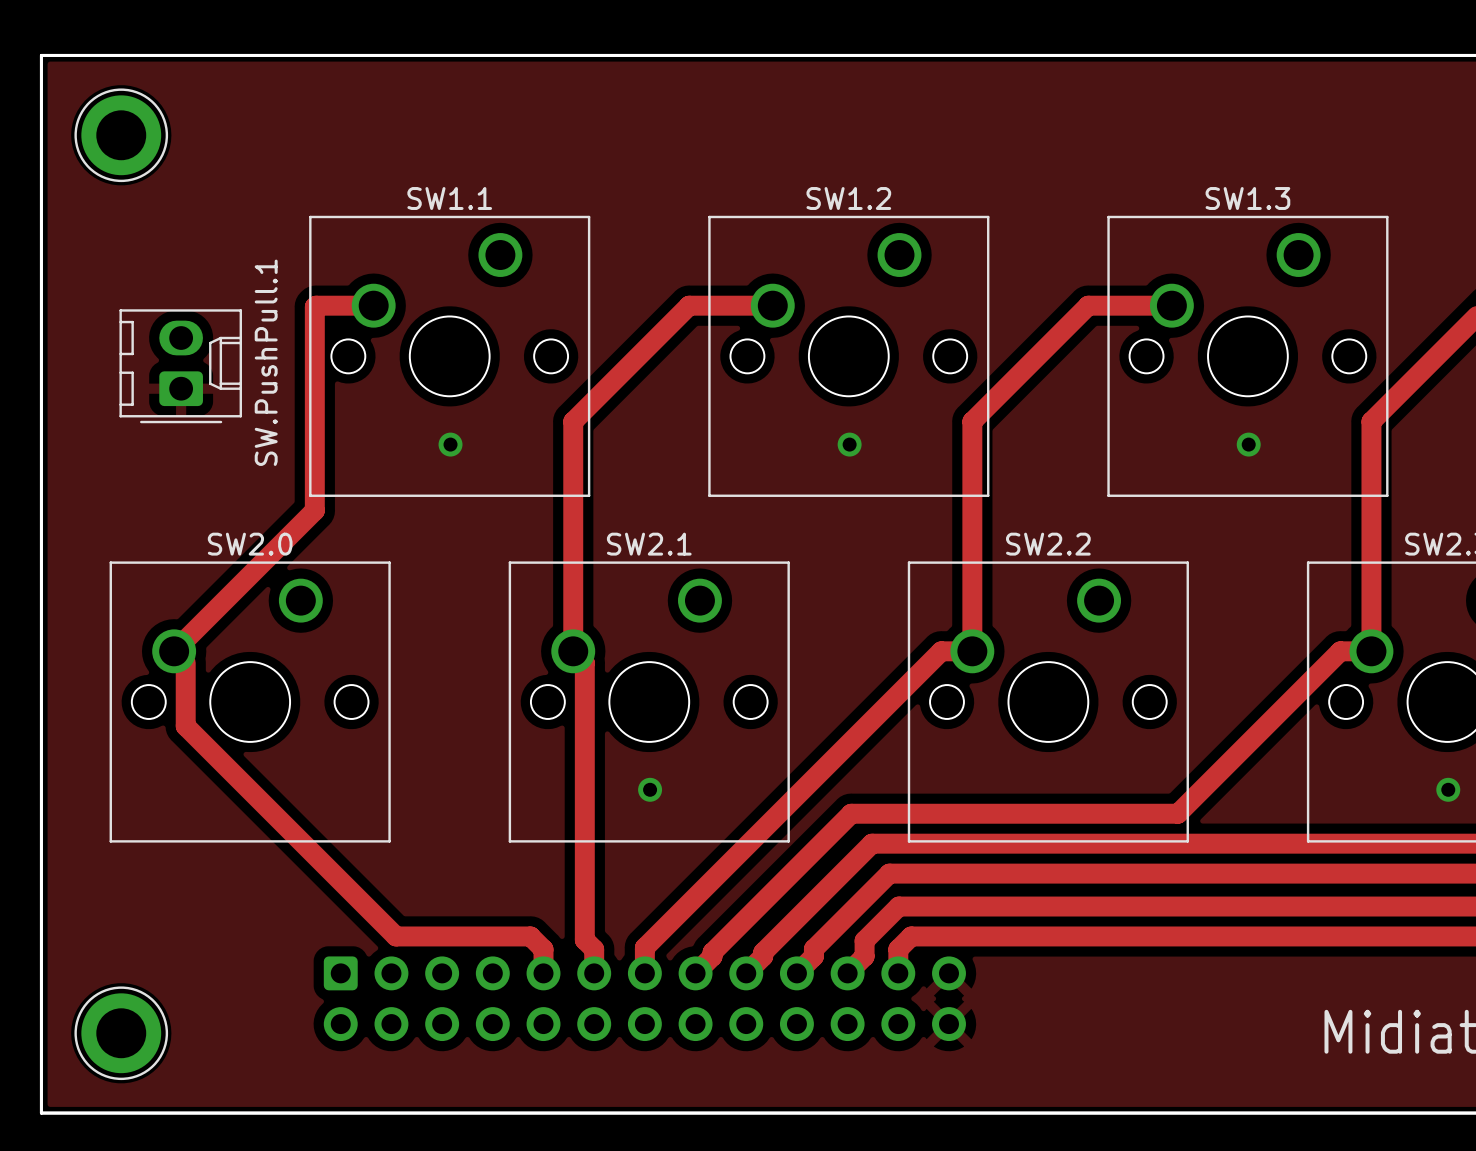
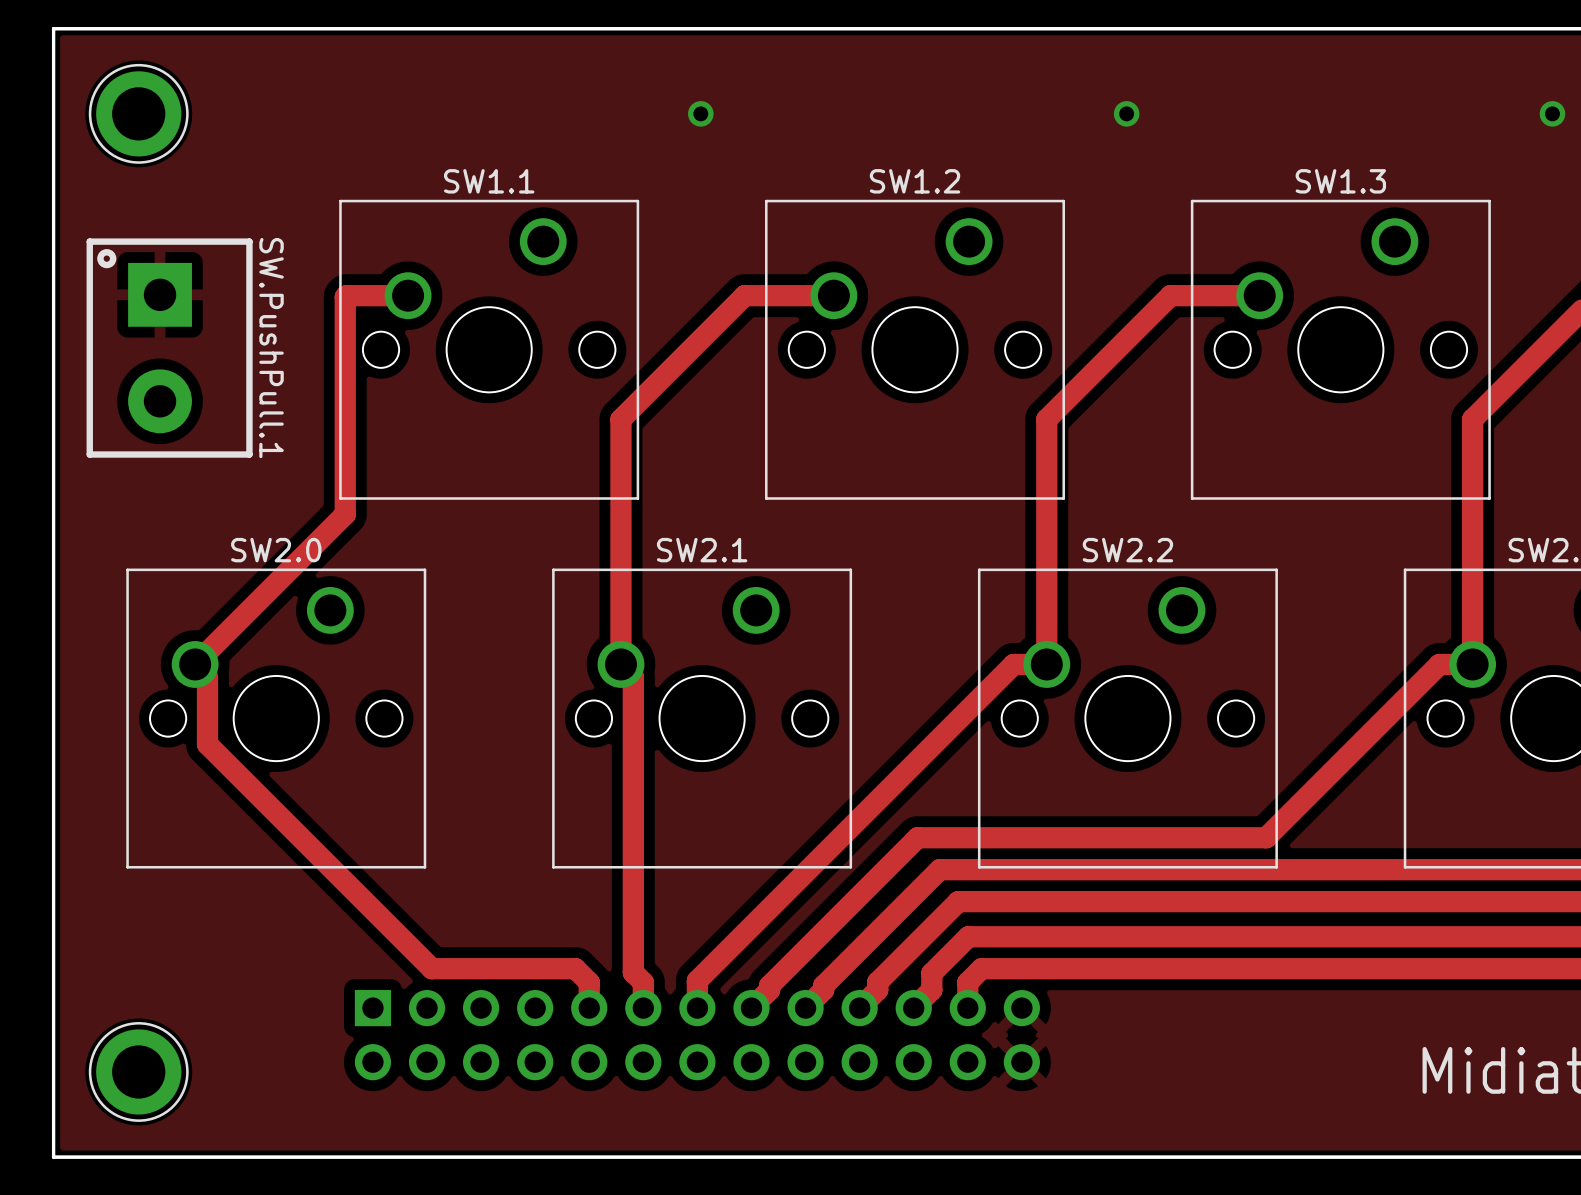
via: none -> (700, 113)
via: none -> (1126, 113)
via: none -> (1552, 113)
SW.PushPull.1 footprint: [119, 309, 242, 424] -> [86, 238, 253, 458]
via: (450, 444) -> none
via: (849, 444) -> none
via: (1248, 444) -> none
via: (650, 789) -> none
via: (1448, 789) -> none
part footprint: [323, 956, 966, 1042] -> [354, 990, 1040, 1081]

